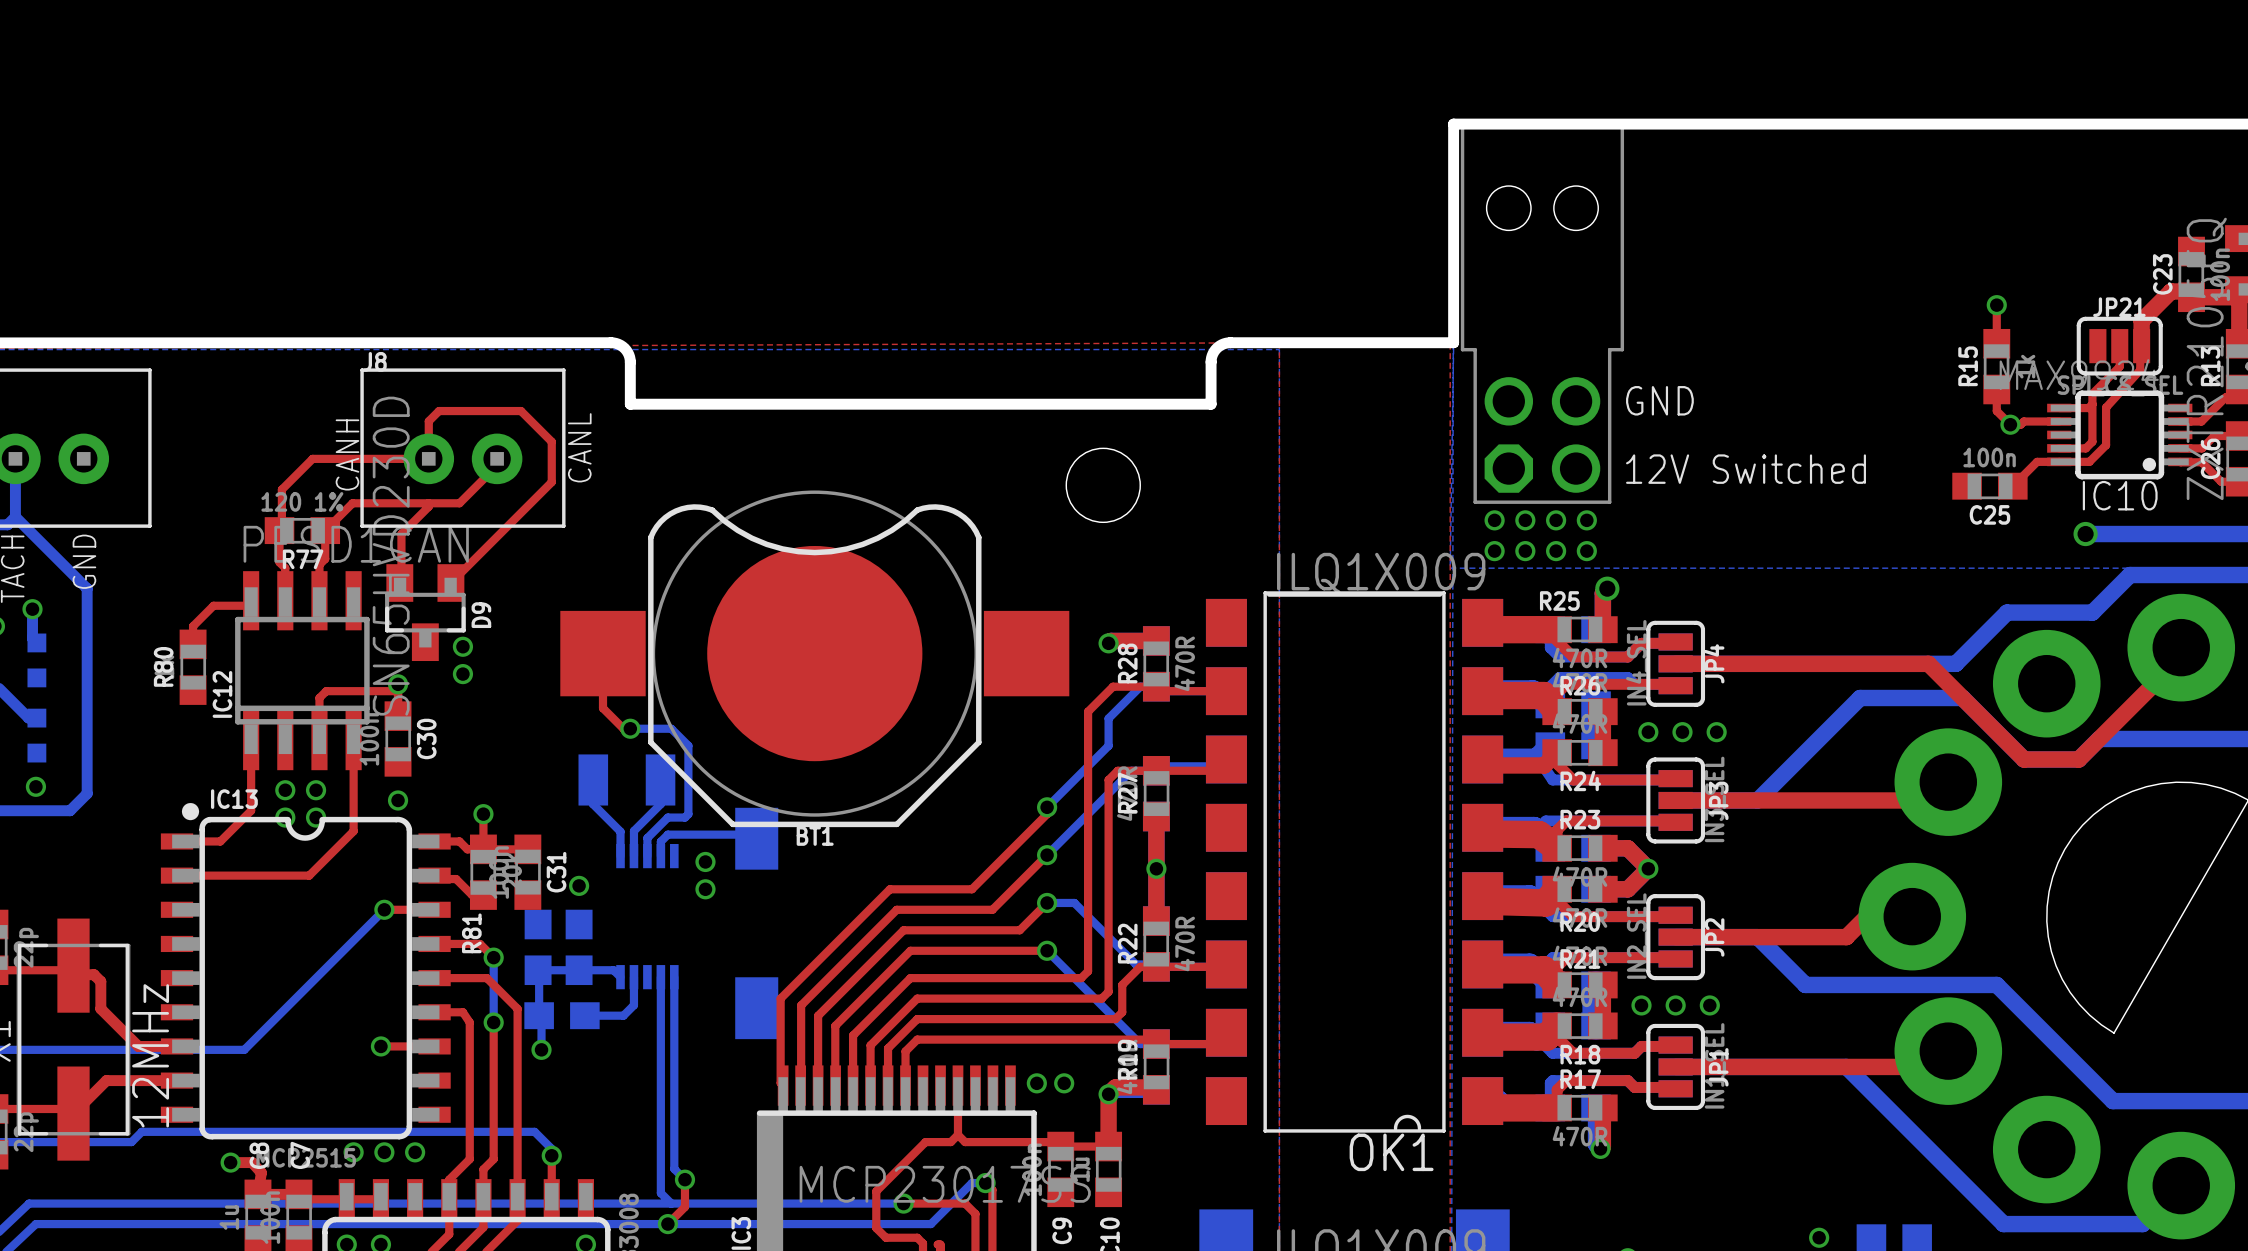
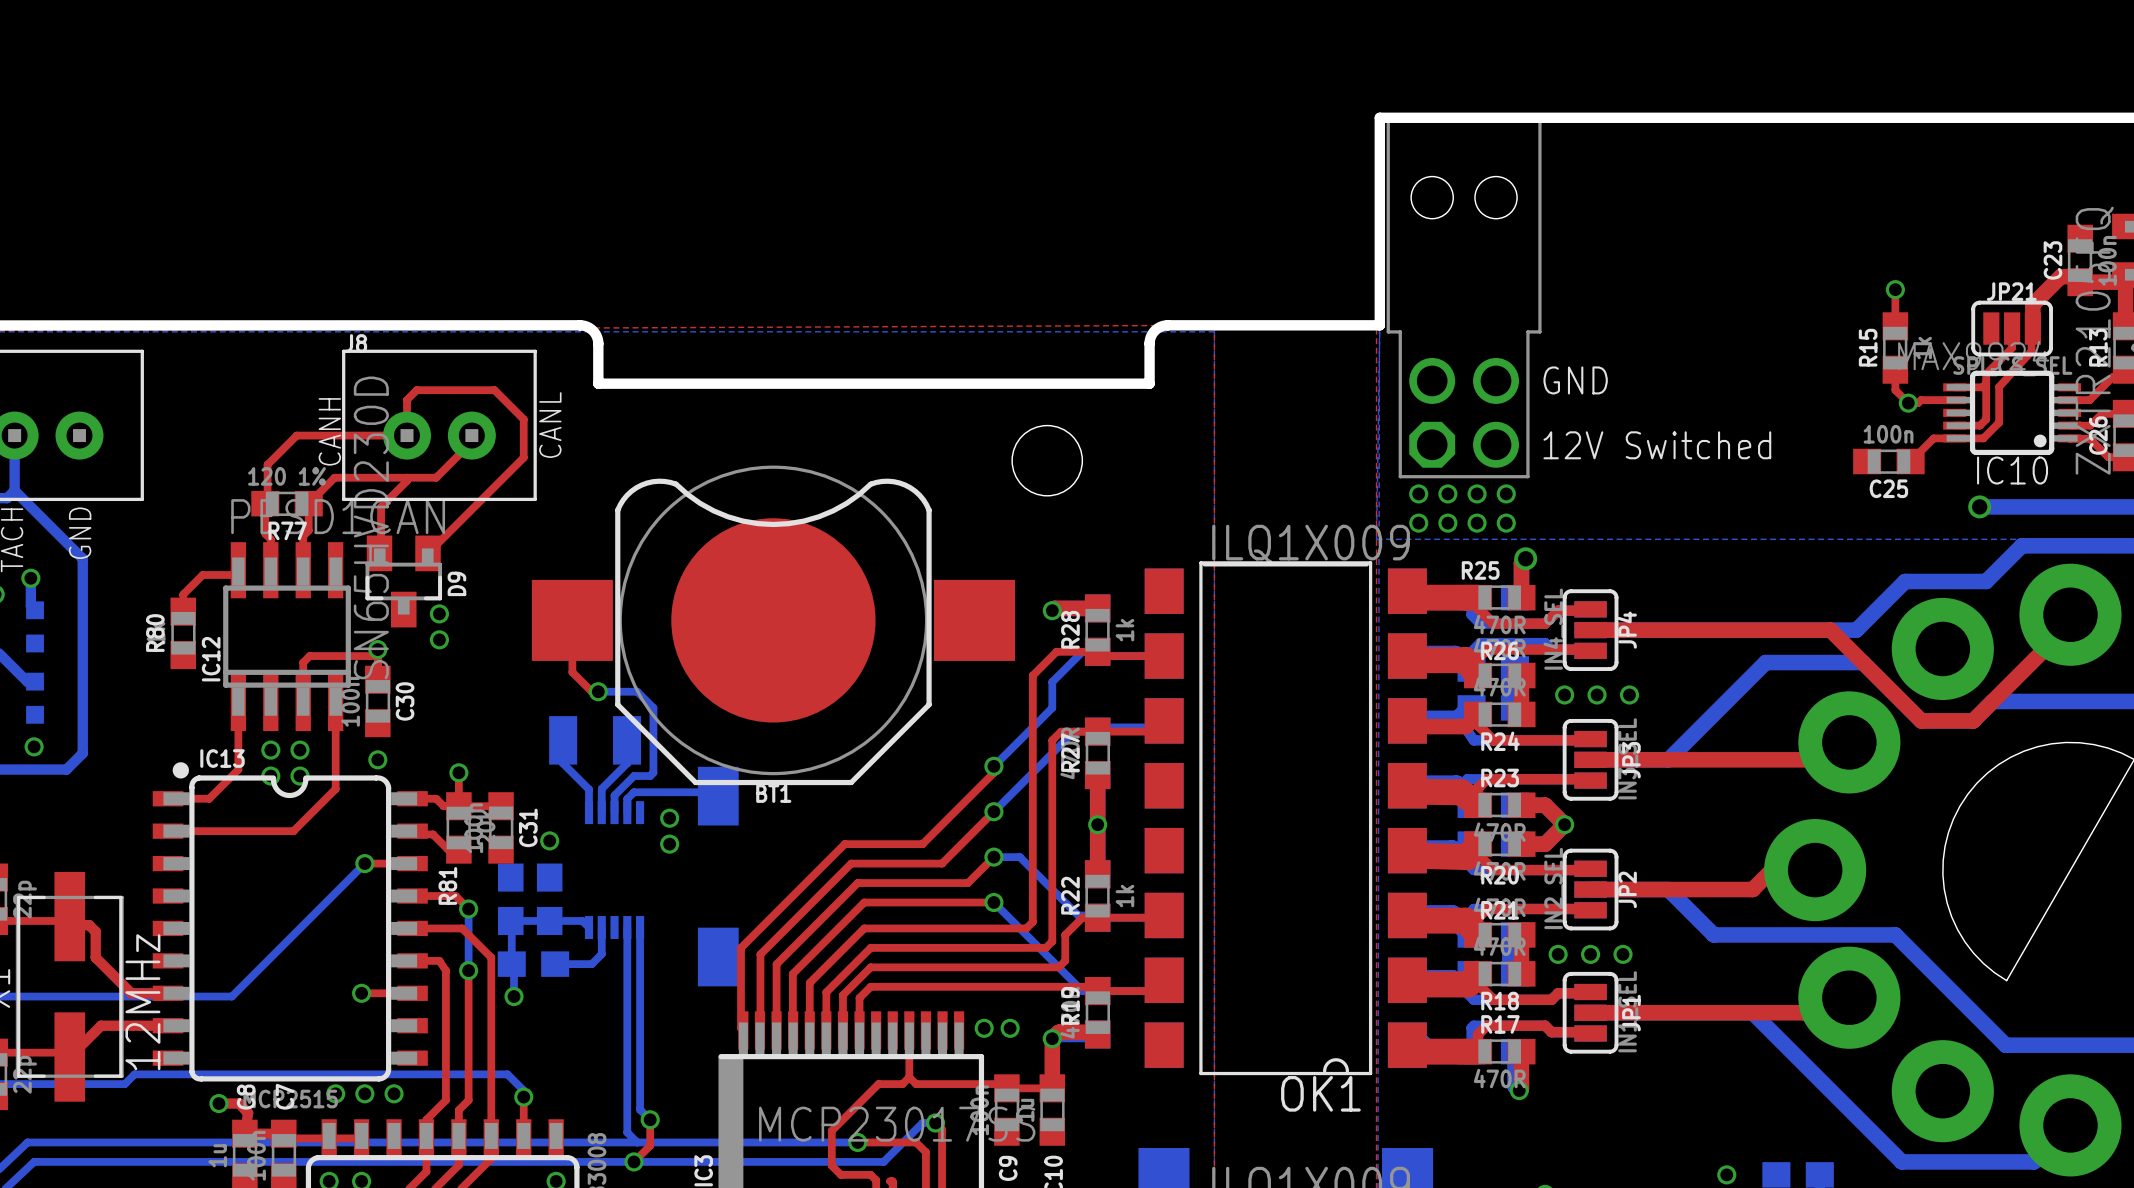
R28 value: 470R (1184, 663) -> 1k (1124, 630)
R22 value: 470R (1184, 943) -> 1k (1124, 896)

